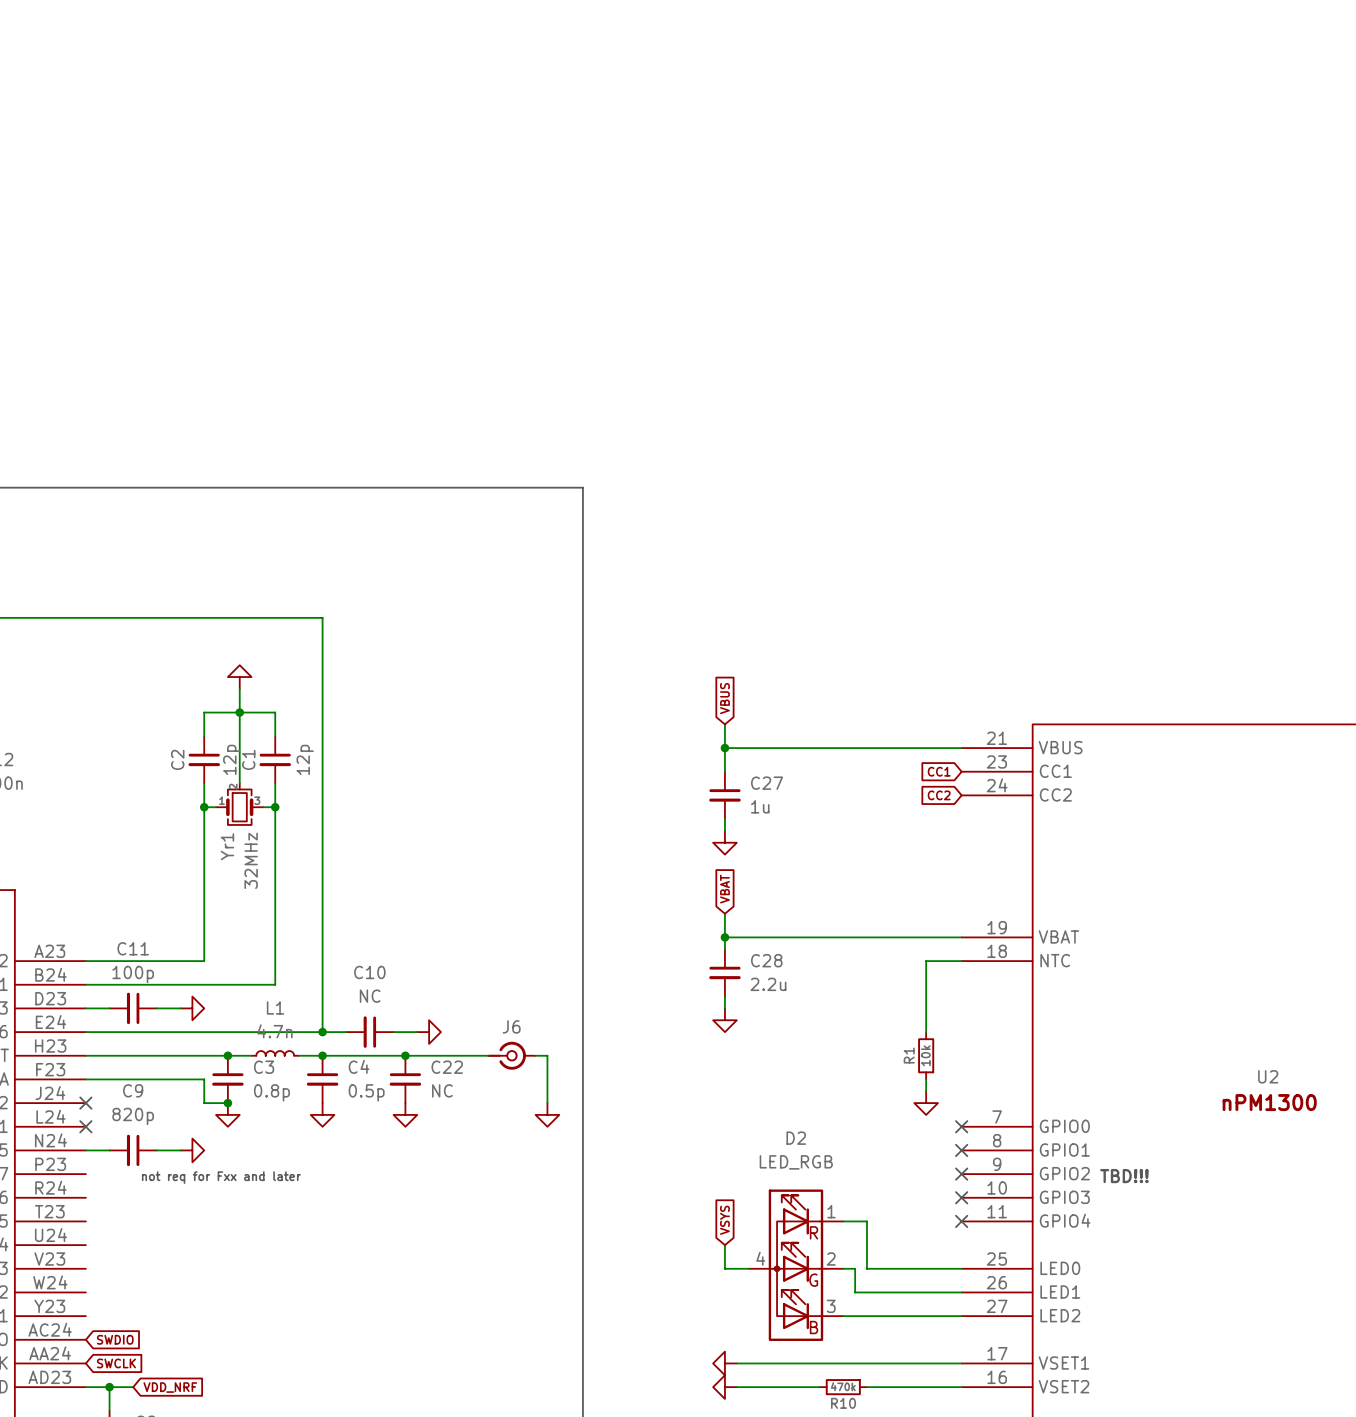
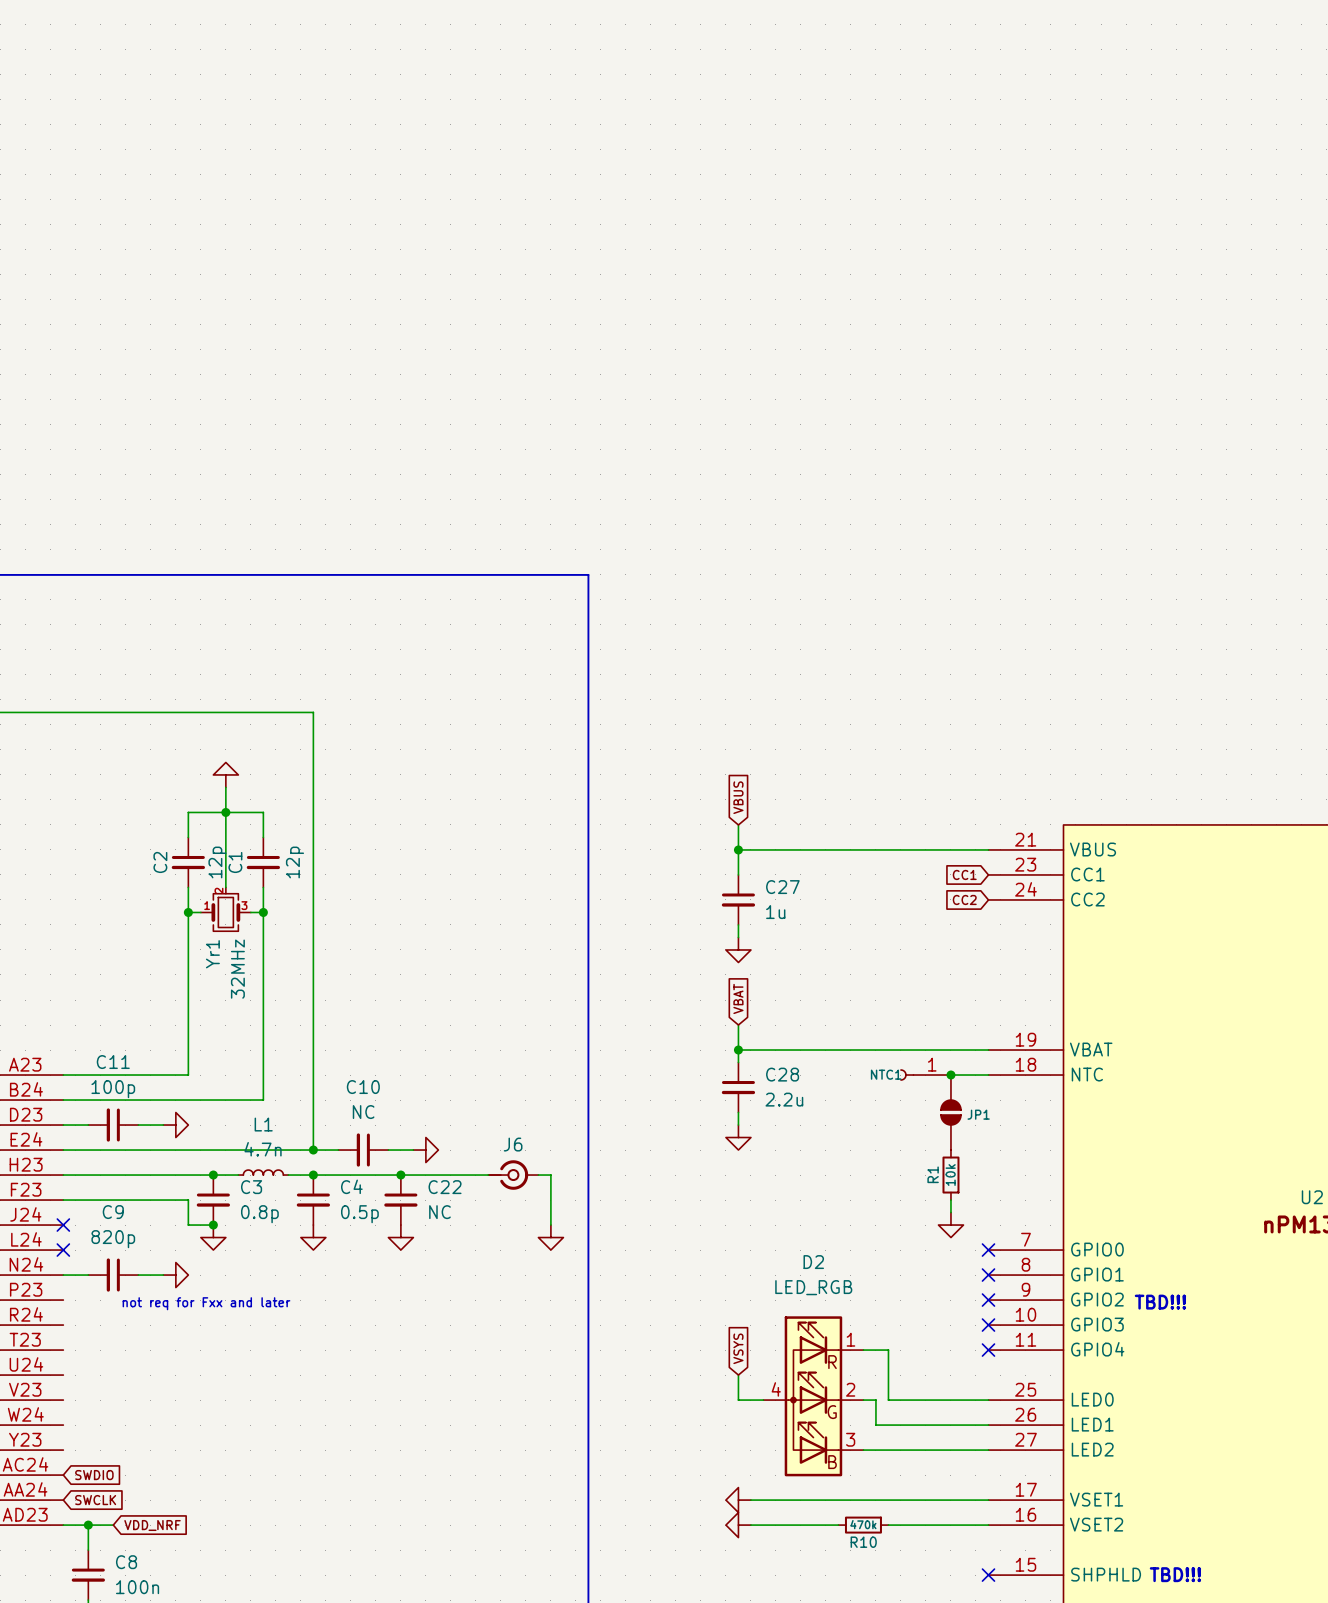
NTC1: none -> (925, 1075)
junction: none -> (950, 1075)
JP1: none -> (950, 1112)

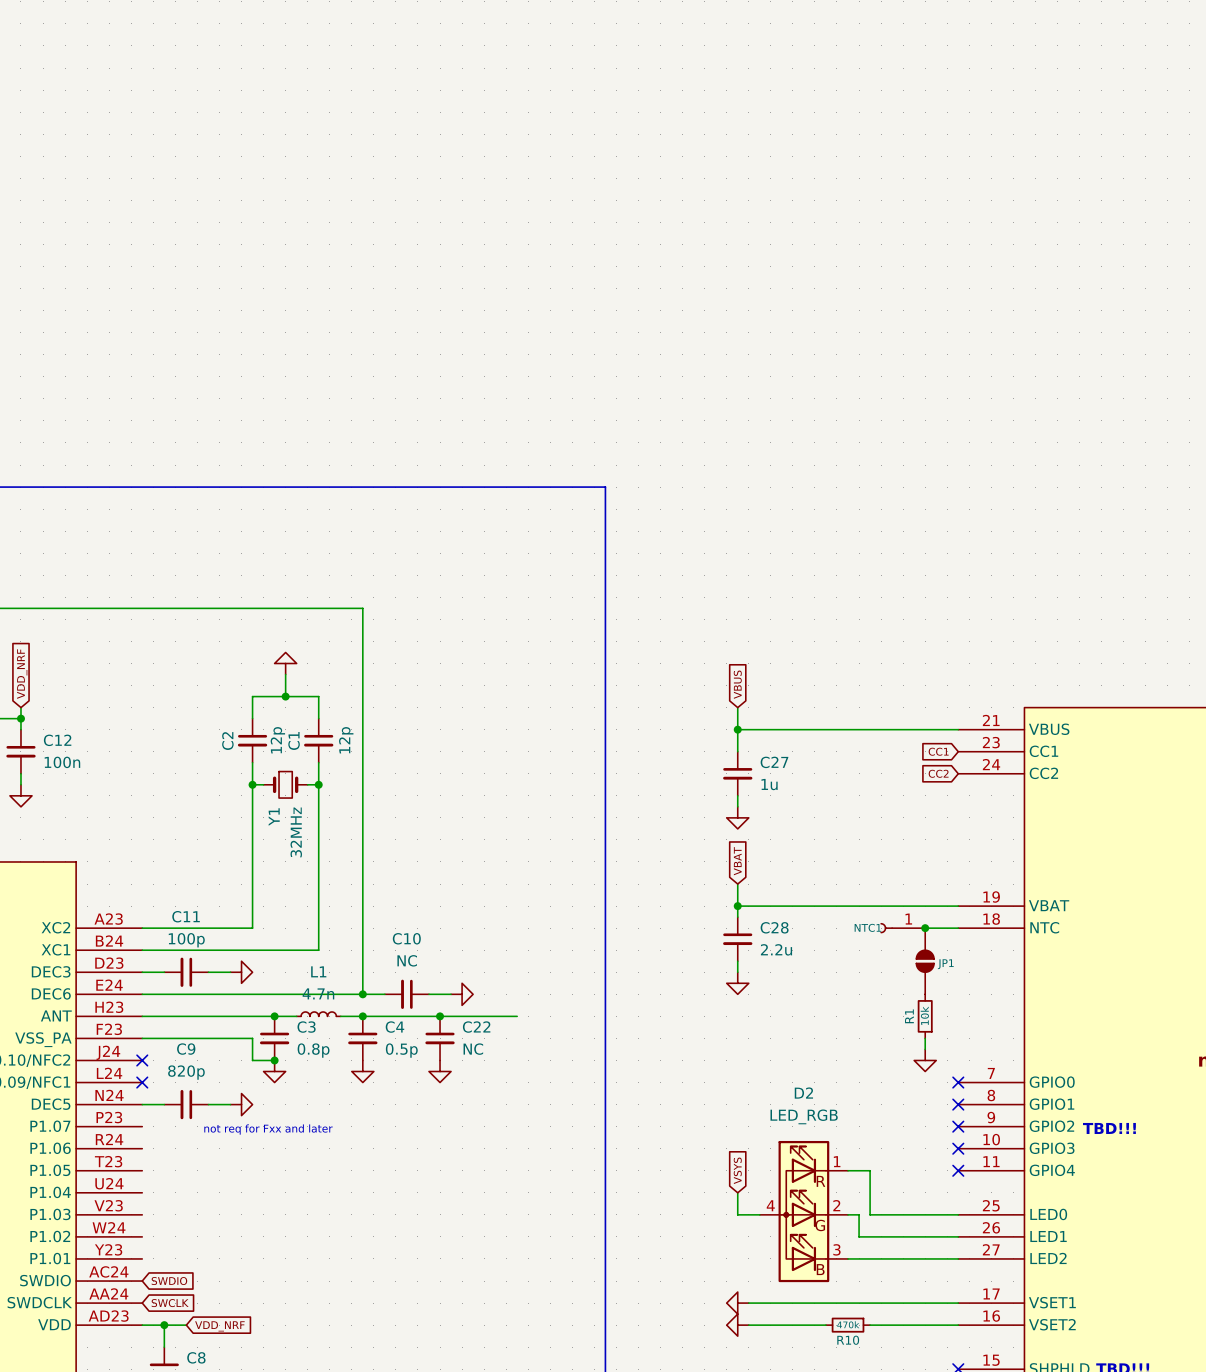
wire: (225, 812) (225, 887) -> none
Yr1: 32MHz (225, 909) -> none
Y1: none -> 32MHz (285, 784)
J6: (513, 1175) -> none
wire: (538, 1175) (550, 1175) (550, 1225) -> none
power symbol: (550, 1237) -> none

